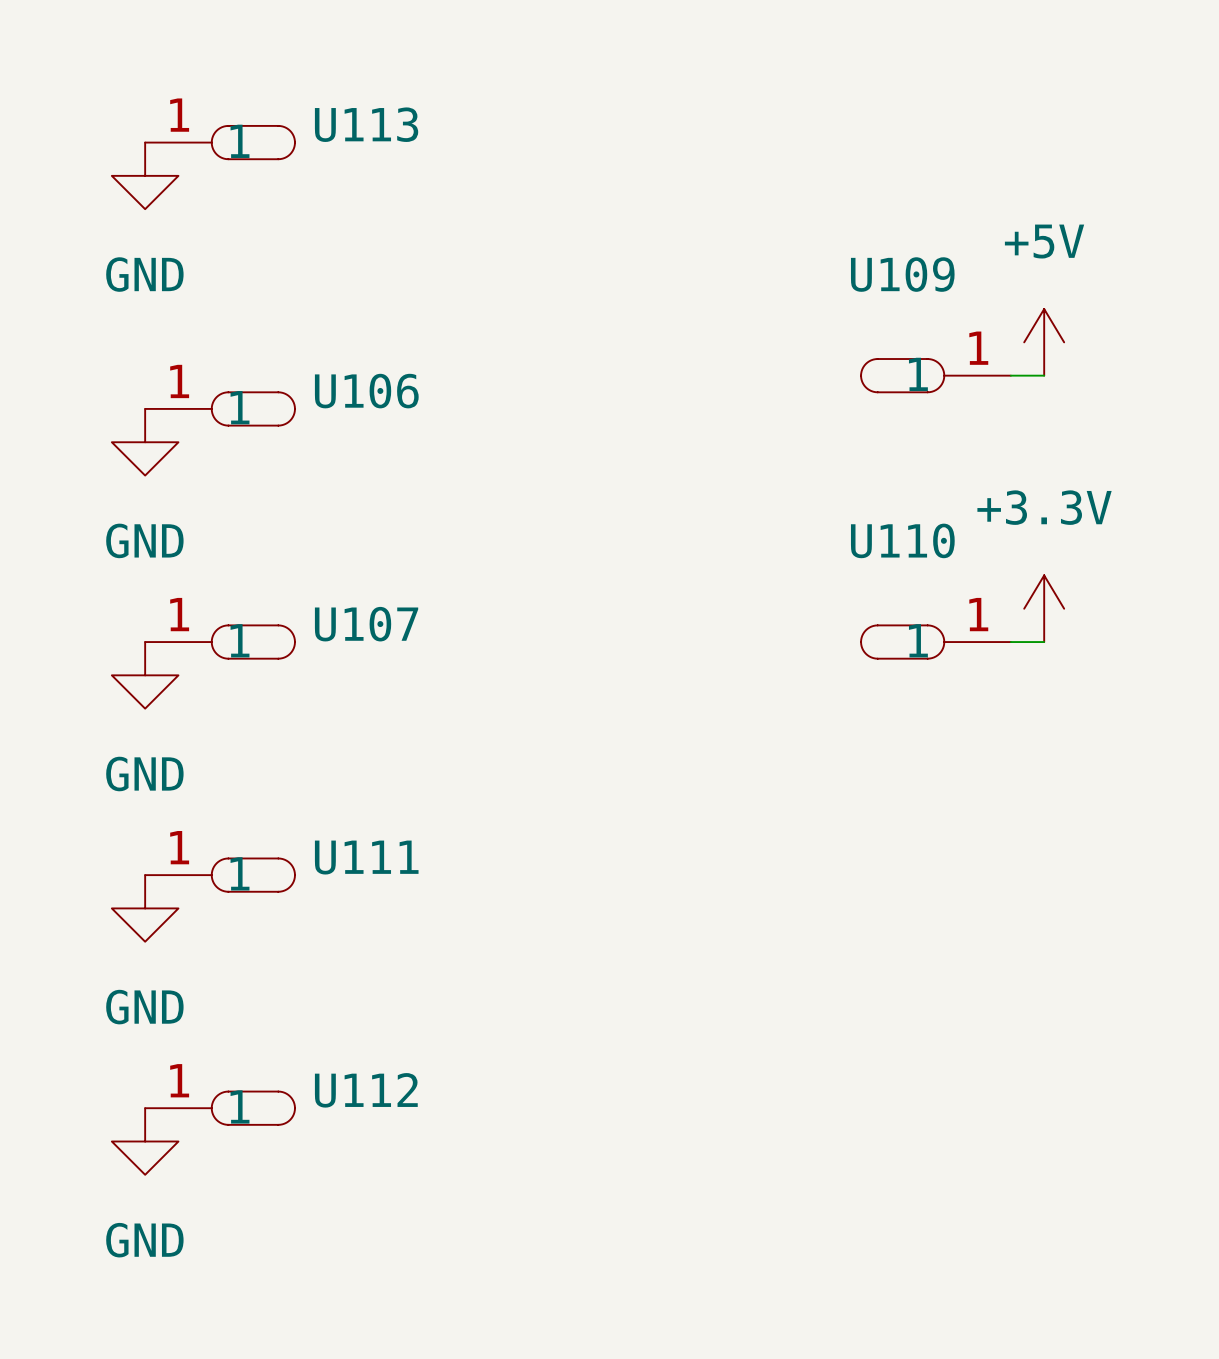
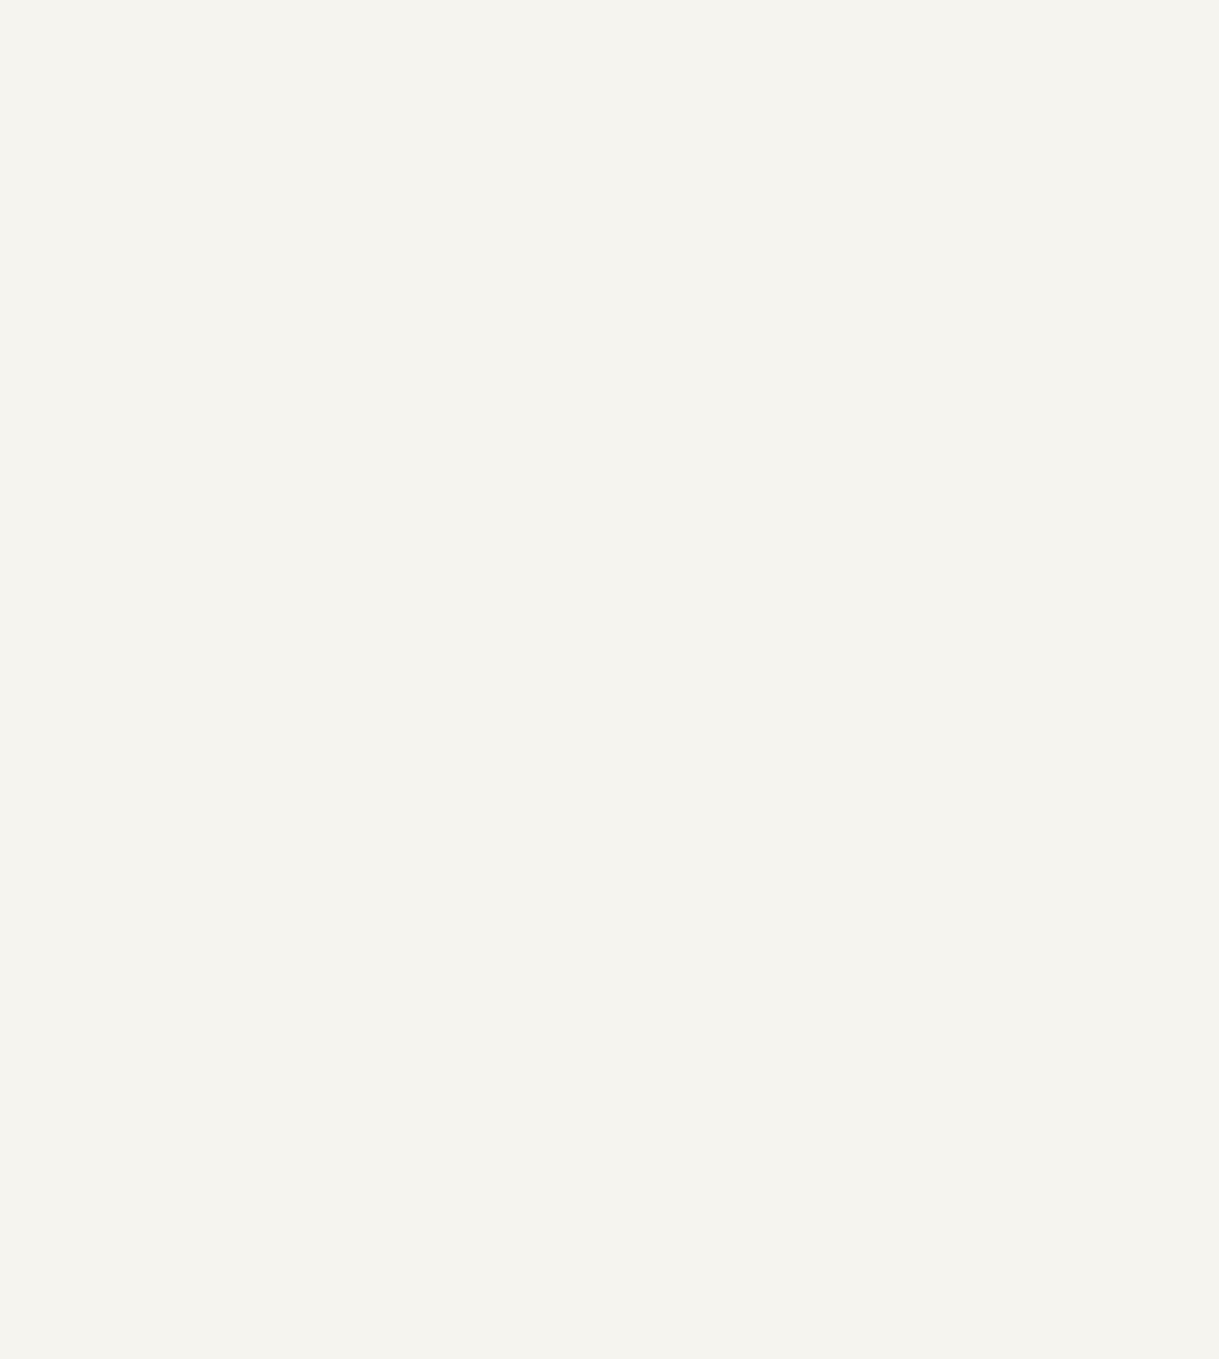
U113: (220, 142) -> none
power symbol: GND (145, 175) -> none
power symbol: +5V (1044, 342) -> none
U109: (935, 375) -> none
wire: (1010, 375) (1044, 375) -> none
U106: (220, 408) -> none
power symbol: GND (145, 442) -> none
power symbol: +3.3V (1044, 608) -> none
U107: (220, 642) -> none
U110: (935, 642) -> none
wire: (1010, 642) (1044, 642) -> none
power symbol: GND (145, 675) -> none
U111: (220, 875) -> none
power symbol: GND (145, 908) -> none
U112: (220, 1108) -> none
power symbol: GND (145, 1141) -> none

